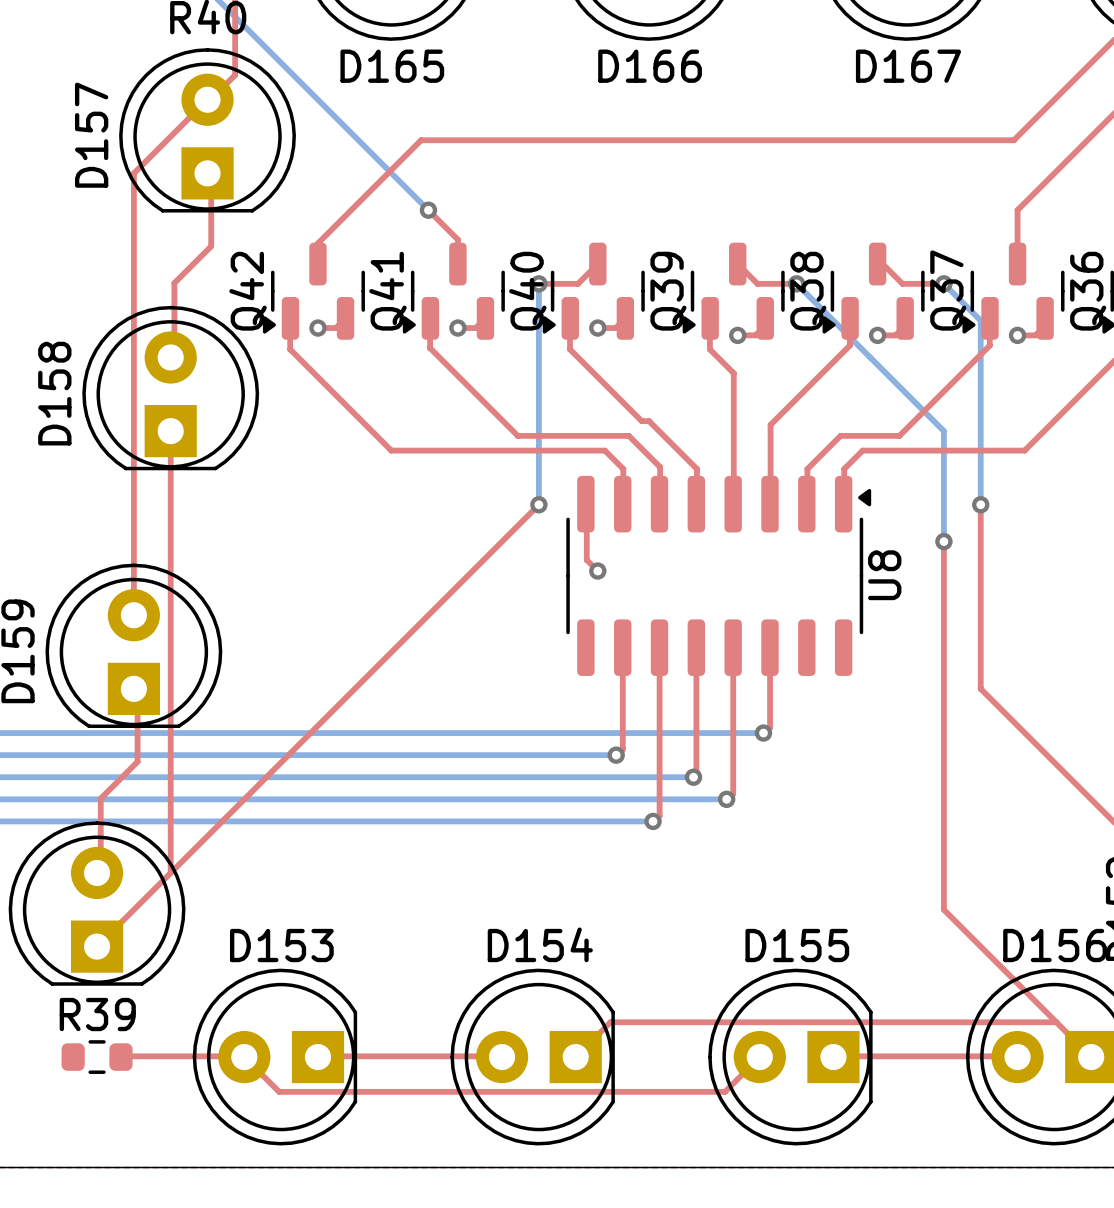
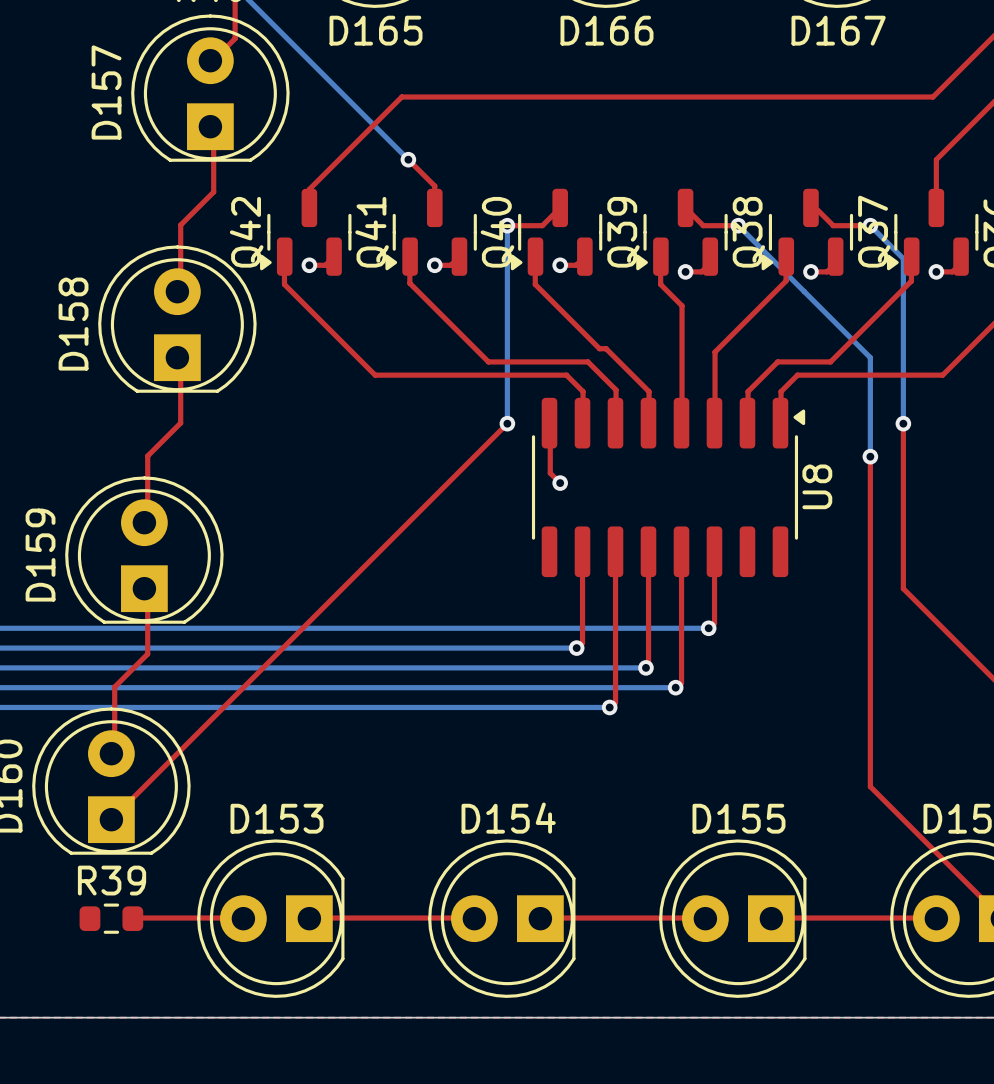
top track: (207, 99) (133, 173) (133, 615) -> none
top track: none -> (180, 357) (180, 423) (147, 456) (147, 522)
top track: (170, 431) (170, 872) -> none
top track: (1056, 1022) (610, 1022) (575, 1057) -> none
top track: none -> (543, 918) (708, 918)
top track: (244, 1057) (279, 1091) (725, 1091) (759, 1057) -> none

